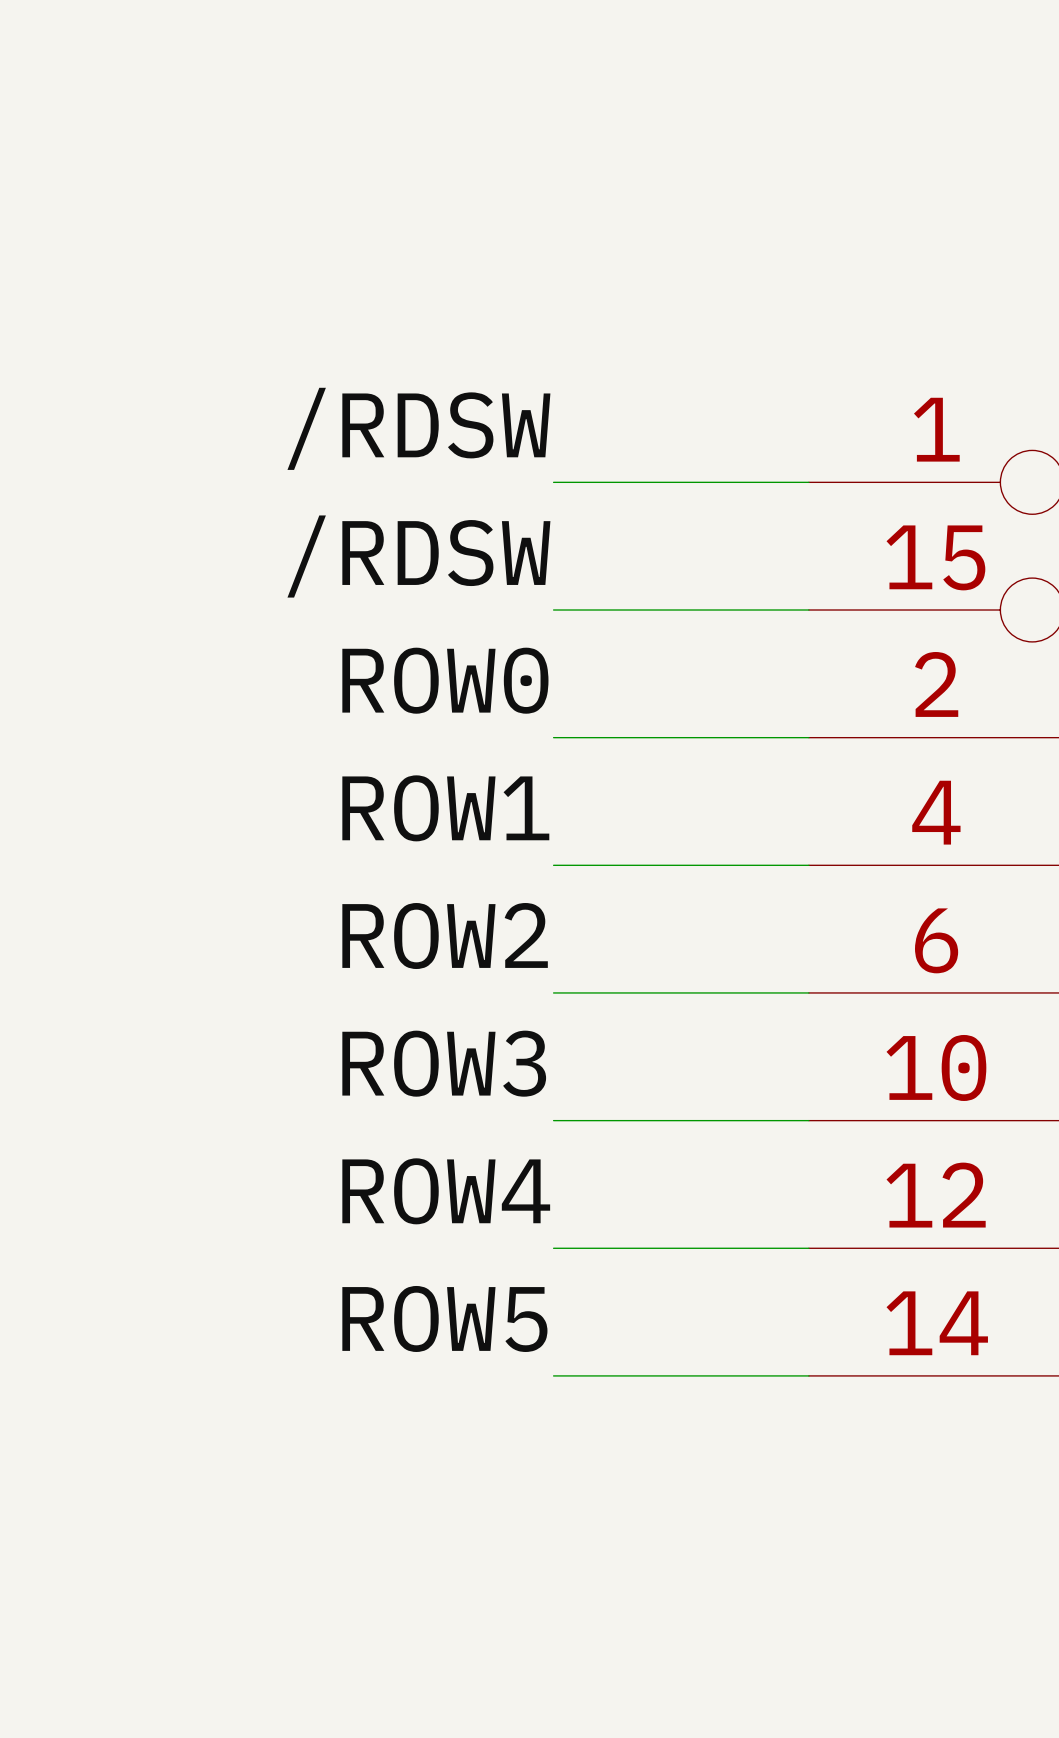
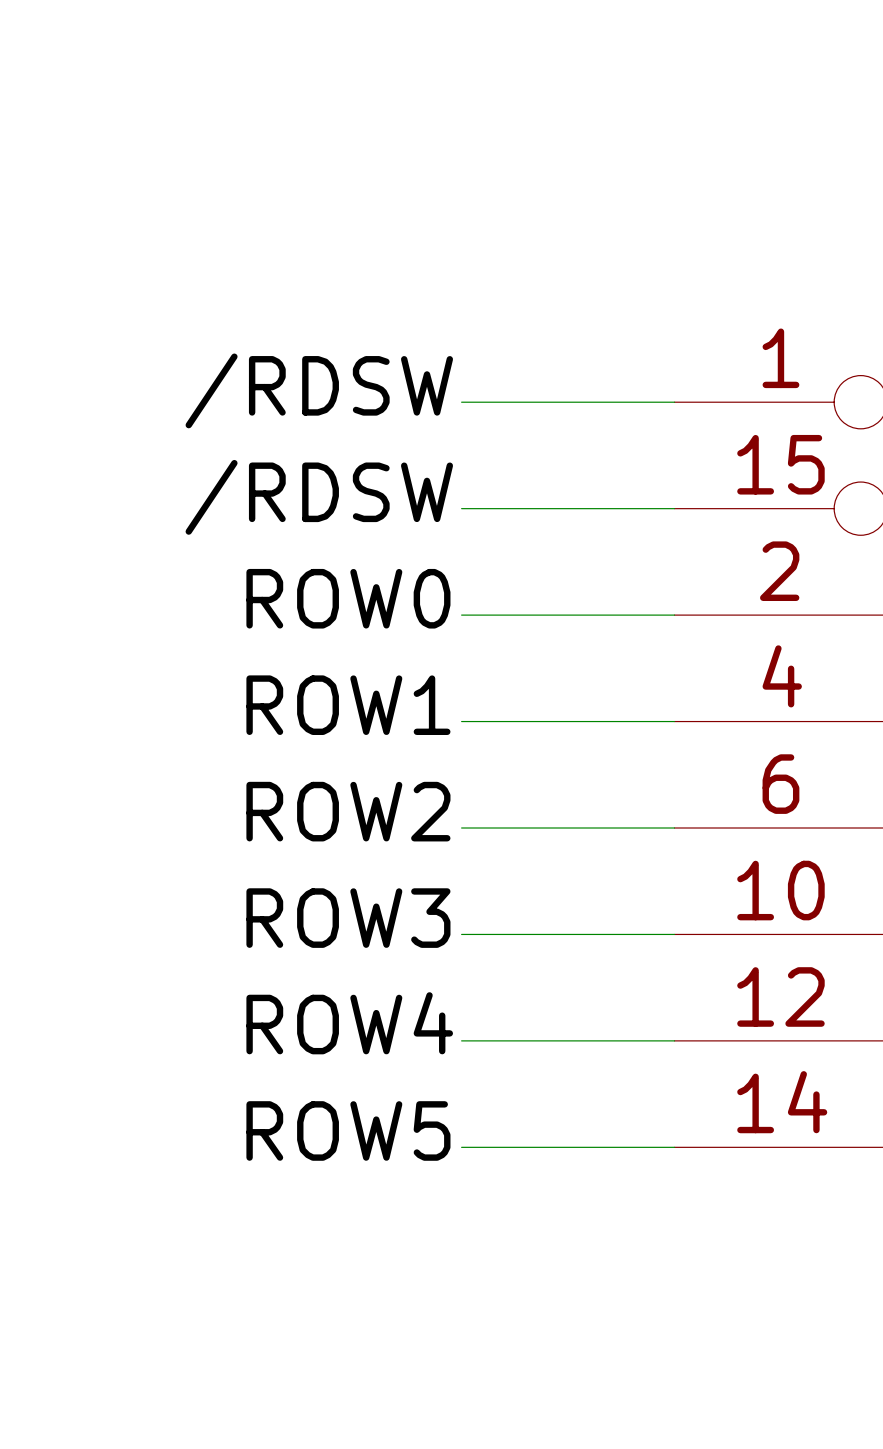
label position: /RDSW (418, 428) -> /RDSW (319, 390)
label position: /RDSW (418, 556) -> /RDSW (319, 497)
label position: ROW0 (445, 680) -> ROW0 (348, 598)
label position: ROW1 (445, 808) -> ROW1 (348, 705)
label position: ROW2 (445, 936) -> ROW2 (348, 811)
label position: ROW3 (444, 1063) -> ROW3 (348, 918)
label position: ROW4 (446, 1191) -> ROW4 (349, 1023)
label position: ROW5 (444, 1318) -> ROW5 (348, 1130)

